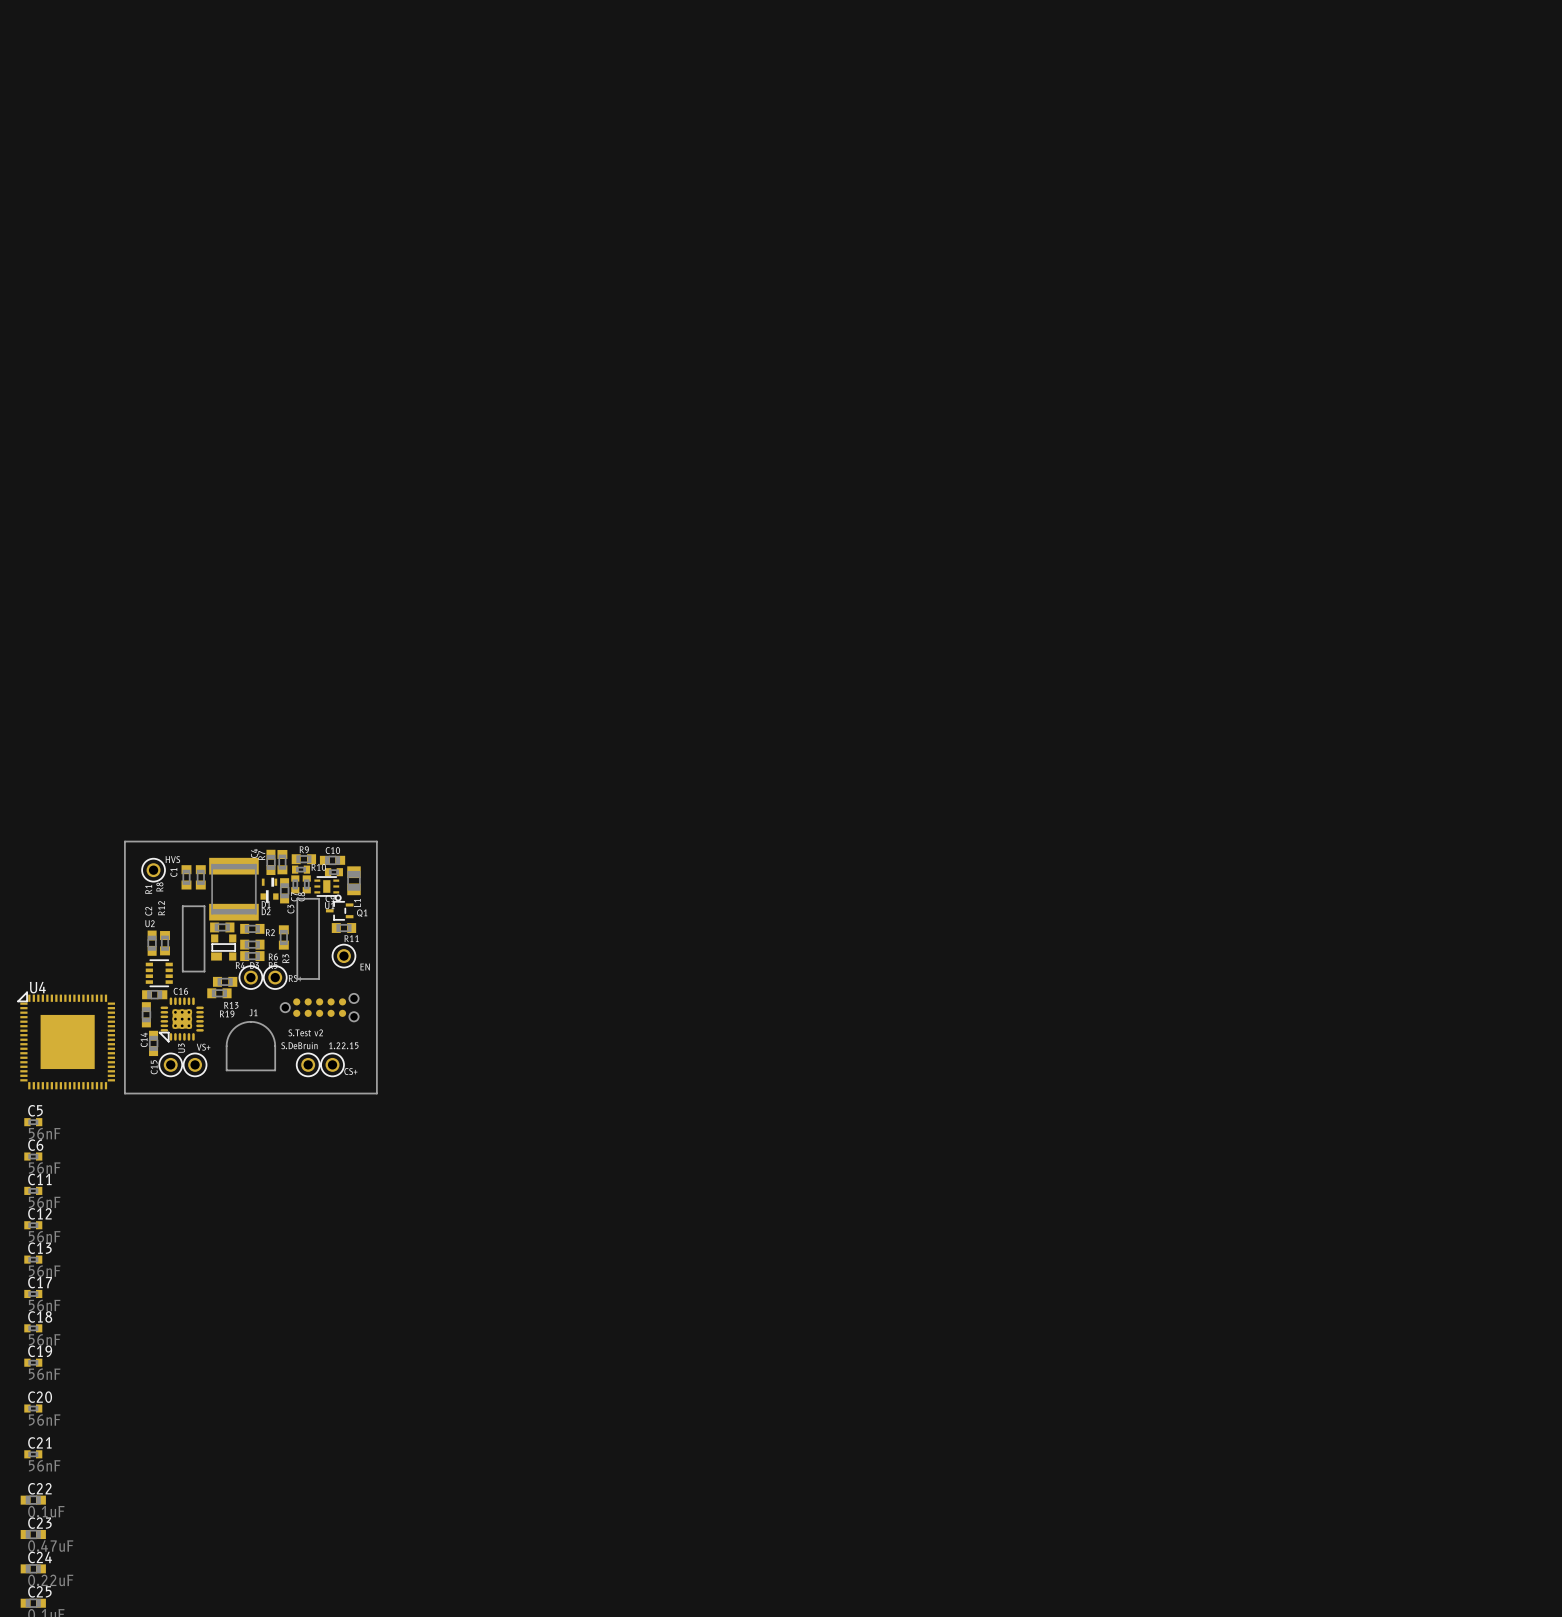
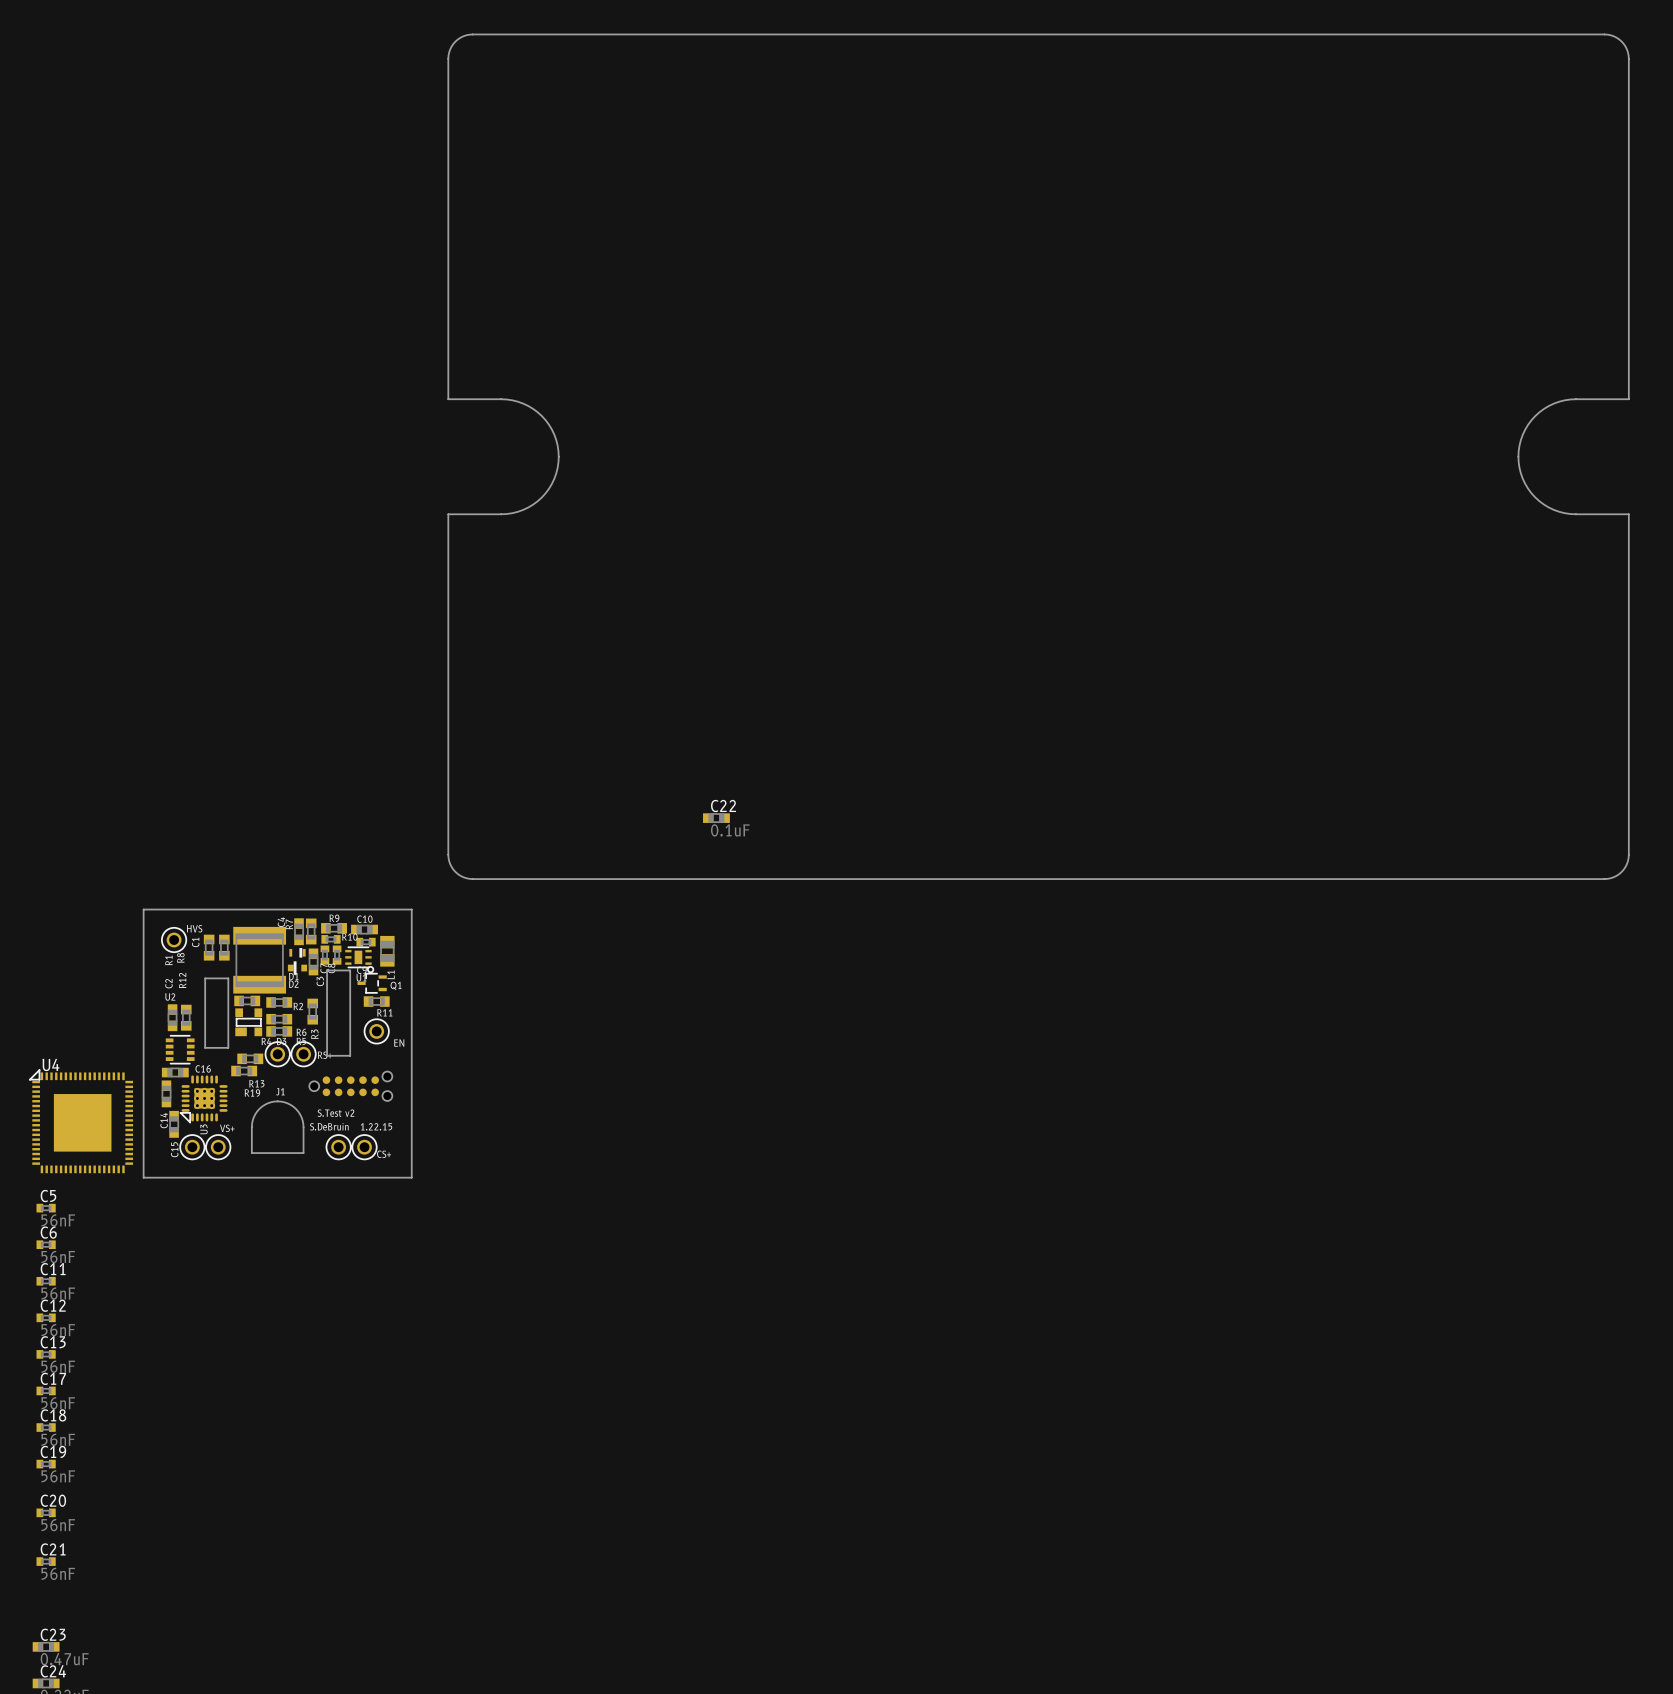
board edge: none -> (472, 34) (1604, 34) (1619, 39) (1626, 49) (1628, 58) (1628, 399) (1570, 399) (1548, 406) (1535, 416) (1528, 424) (1520, 440) (1518, 456) (1520, 473) (1528, 488) (1535, 497) (1548, 507) (1570, 514) (1628, 514) (1628, 854) (1623, 869) (1613, 877) (1604, 879) (472, 879) (457, 874) (450, 864) (448, 854) (448, 514) (506, 514) (528, 507) (541, 497) (549, 488) (556, 473) (558, 456) (556, 440) (549, 424) (541, 416) (528, 406) (506, 399) (448, 399) (448, 55) (455, 41) (463, 36) (472, 34)
C22 position: (33, 1500) -> (716, 818)

